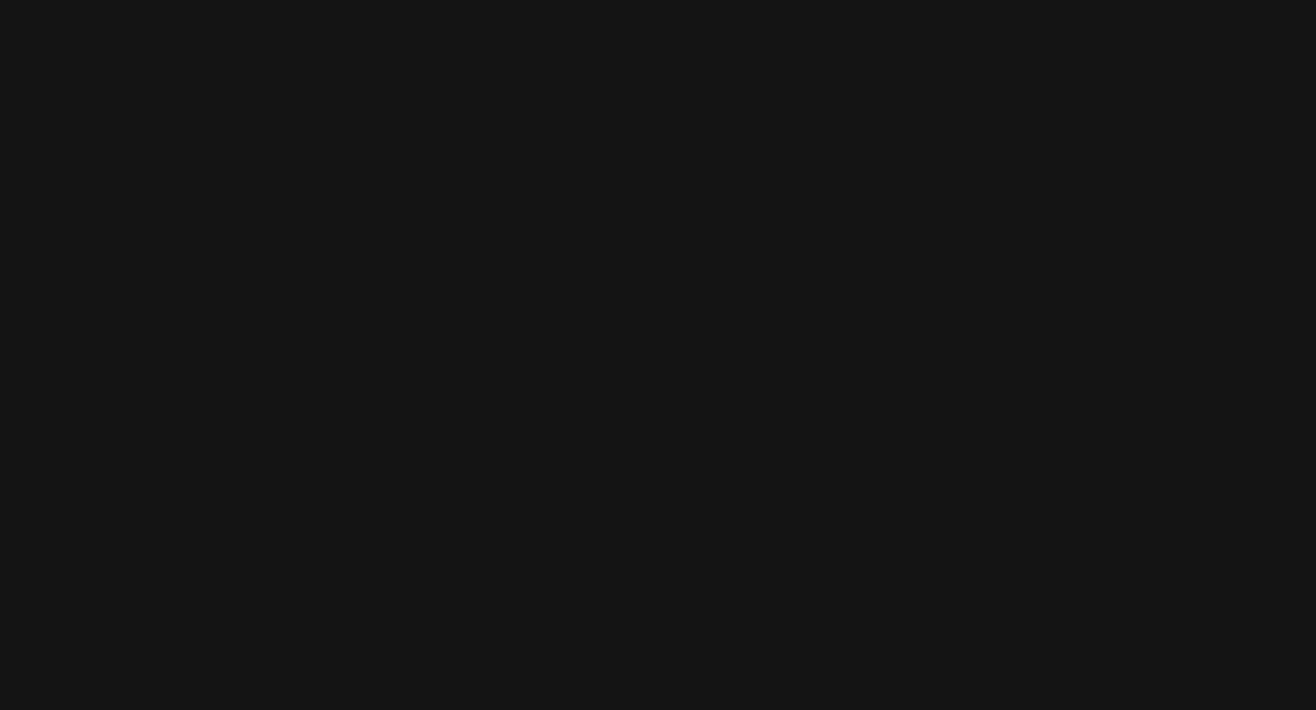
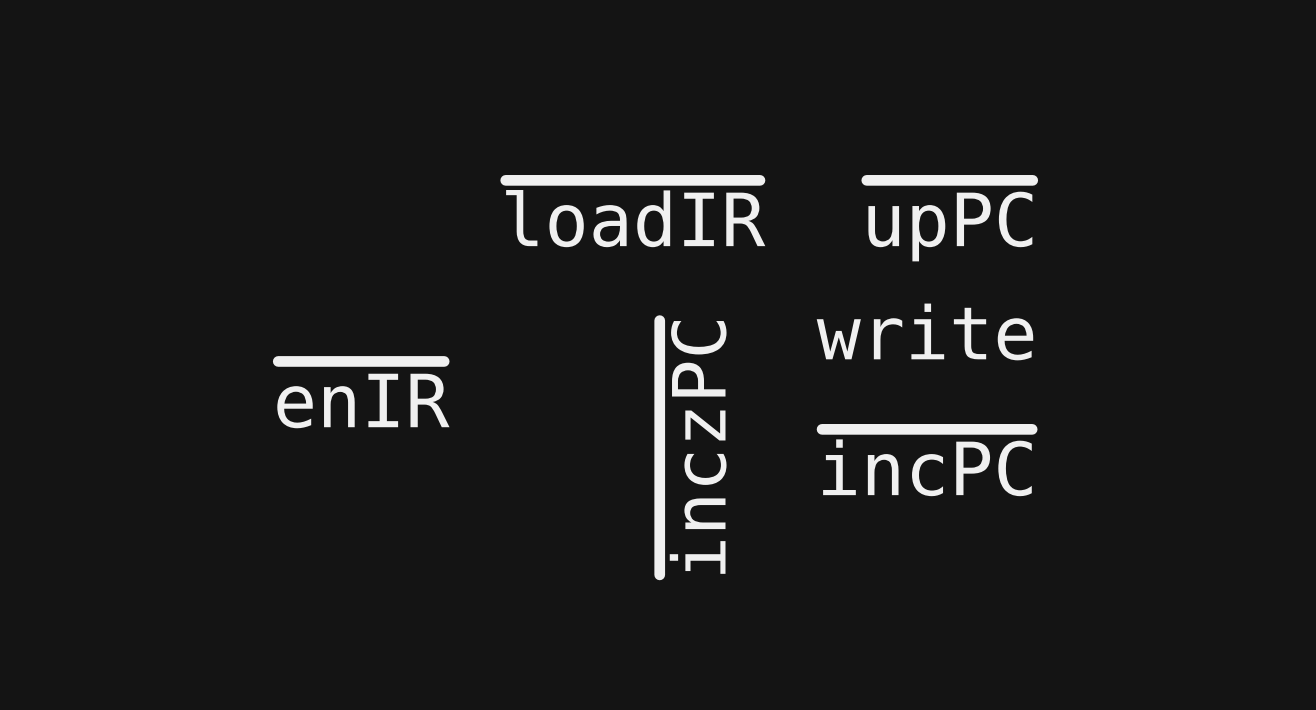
text: none -> ~{loadIR} (635, 213)
text: none -> ~{upPC} (949, 220)
text: none -> write (924, 331)
text: none -> ~{enIR} (363, 394)
text: none -> ~{inczPC} (693, 447)
text: none -> ~{incPC} (927, 462)

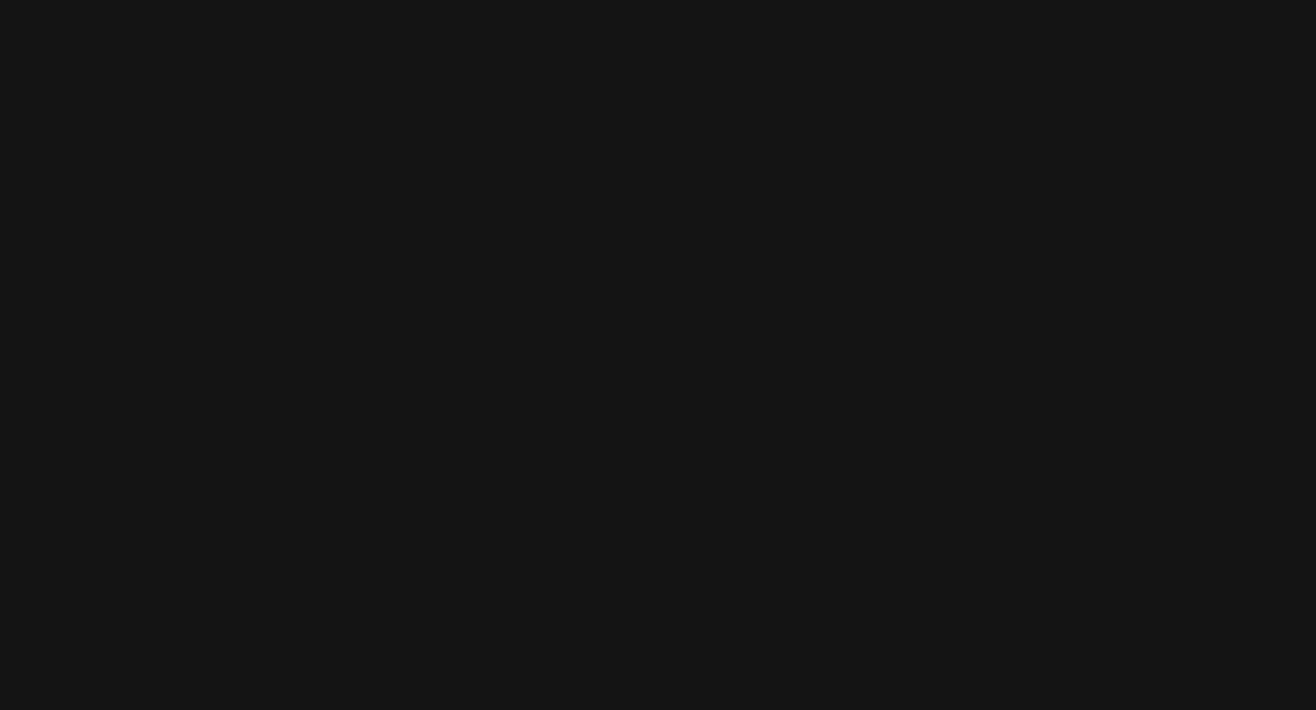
text: ~{loadIR} (635, 213) -> none
text: ~{upPC} (949, 220) -> none
text: write (924, 331) -> none
text: ~{enIR} (363, 394) -> none
text: ~{inczPC} (693, 447) -> none
text: ~{incPC} (927, 462) -> none

